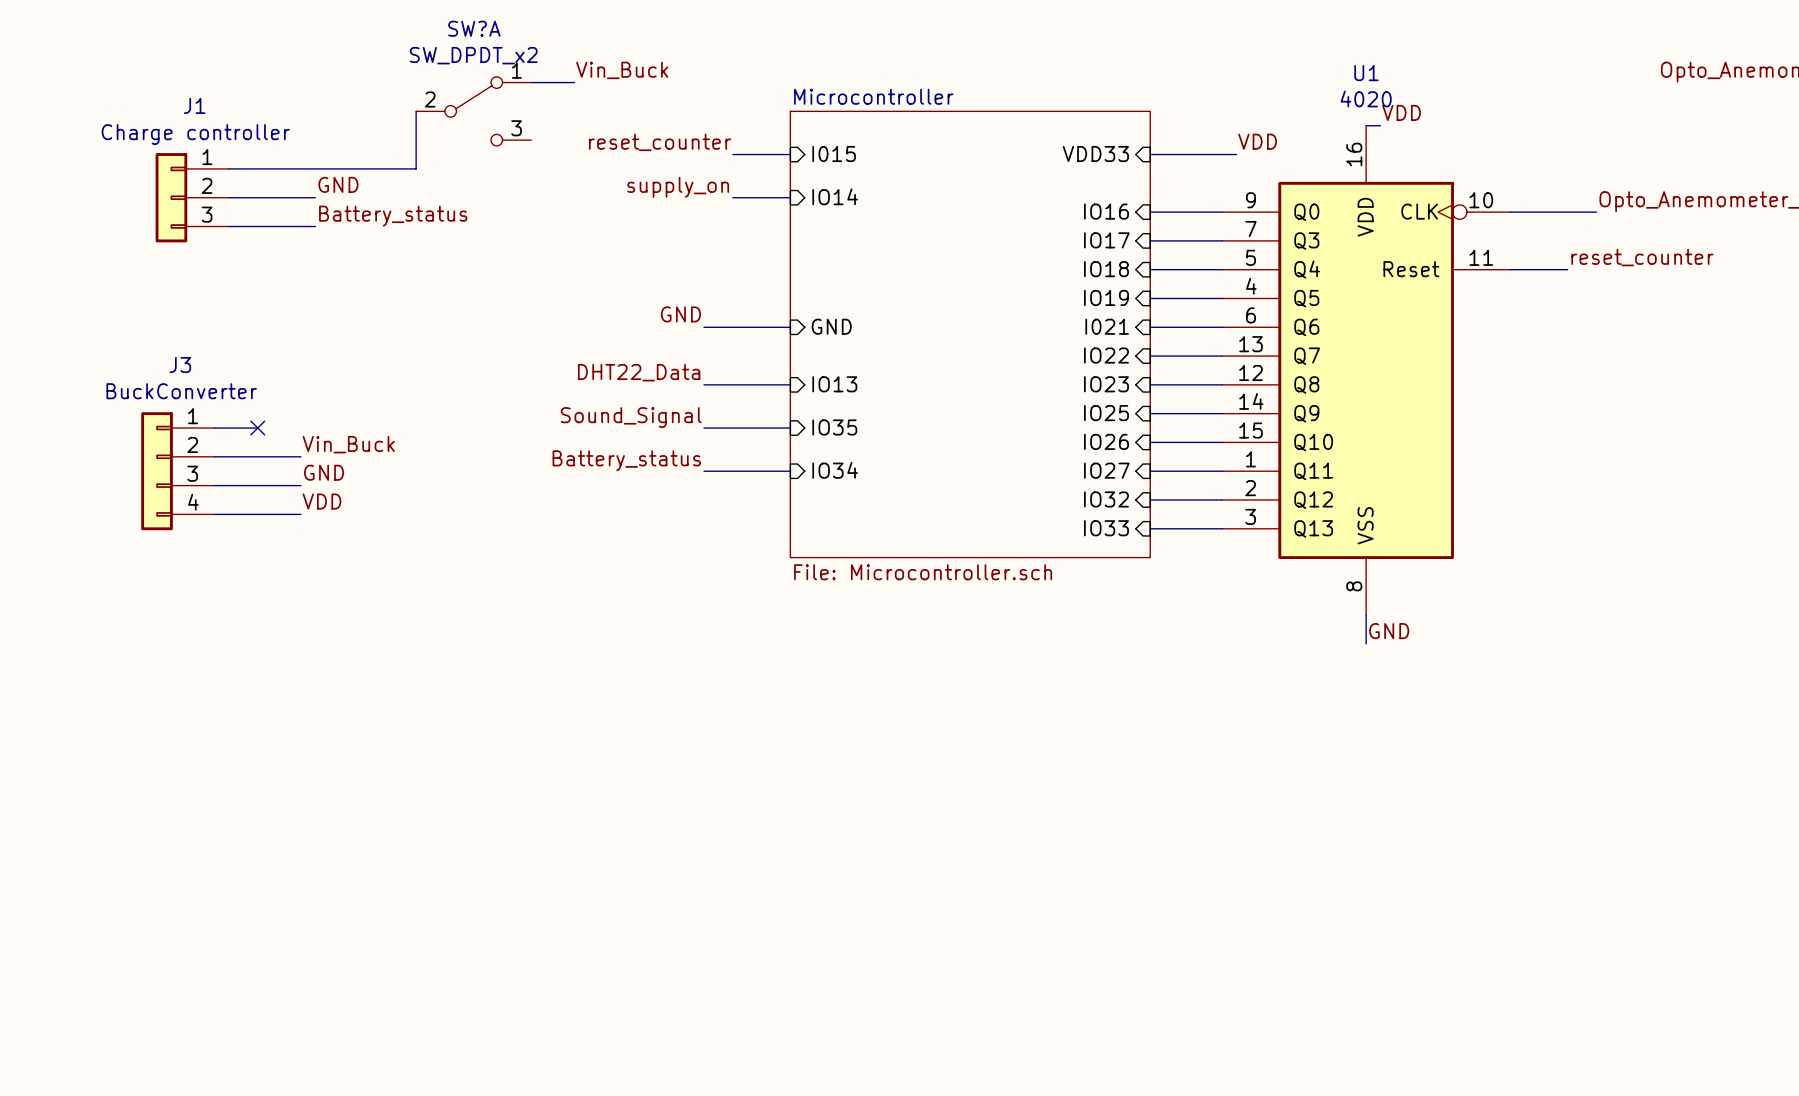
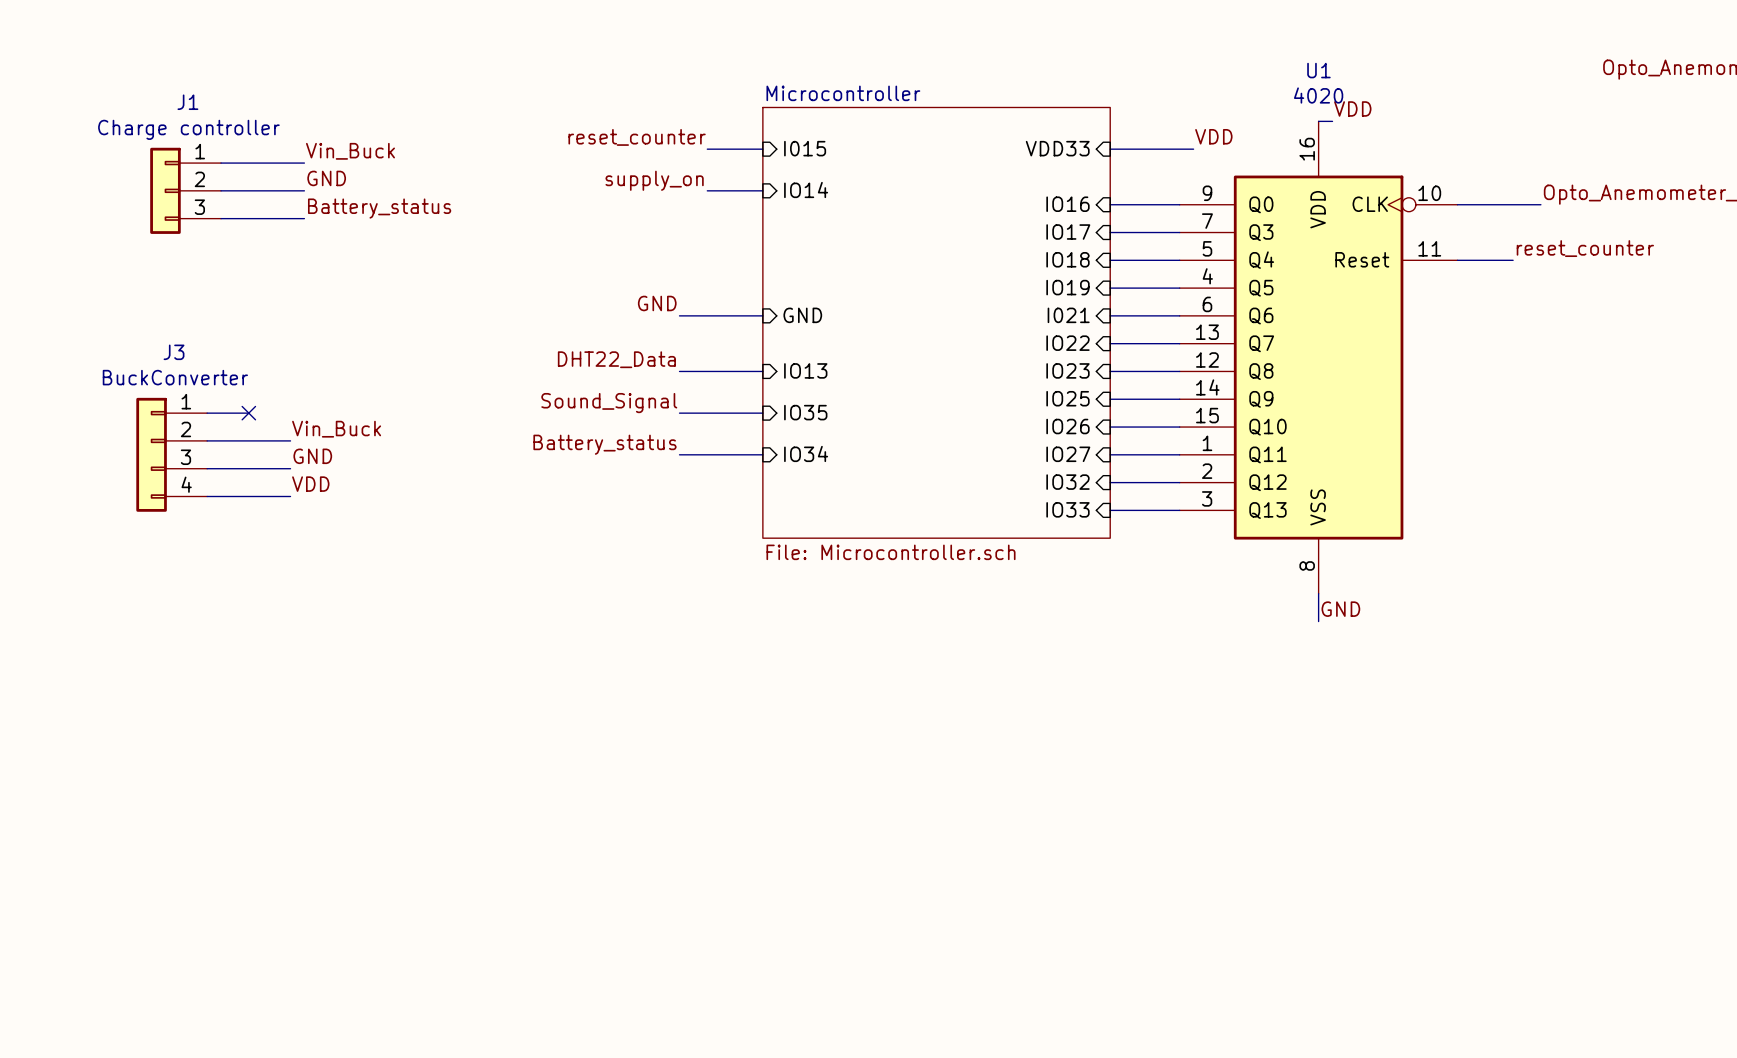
label position: Vin_Buck (622, 70) -> Vin_Buck (350, 151)
wire: (531, 82) (574, 82) -> none
wire: (416, 111) (416, 168) (315, 168) -> none
SW?A: SW_DPDT_x2 (473, 111) -> none

